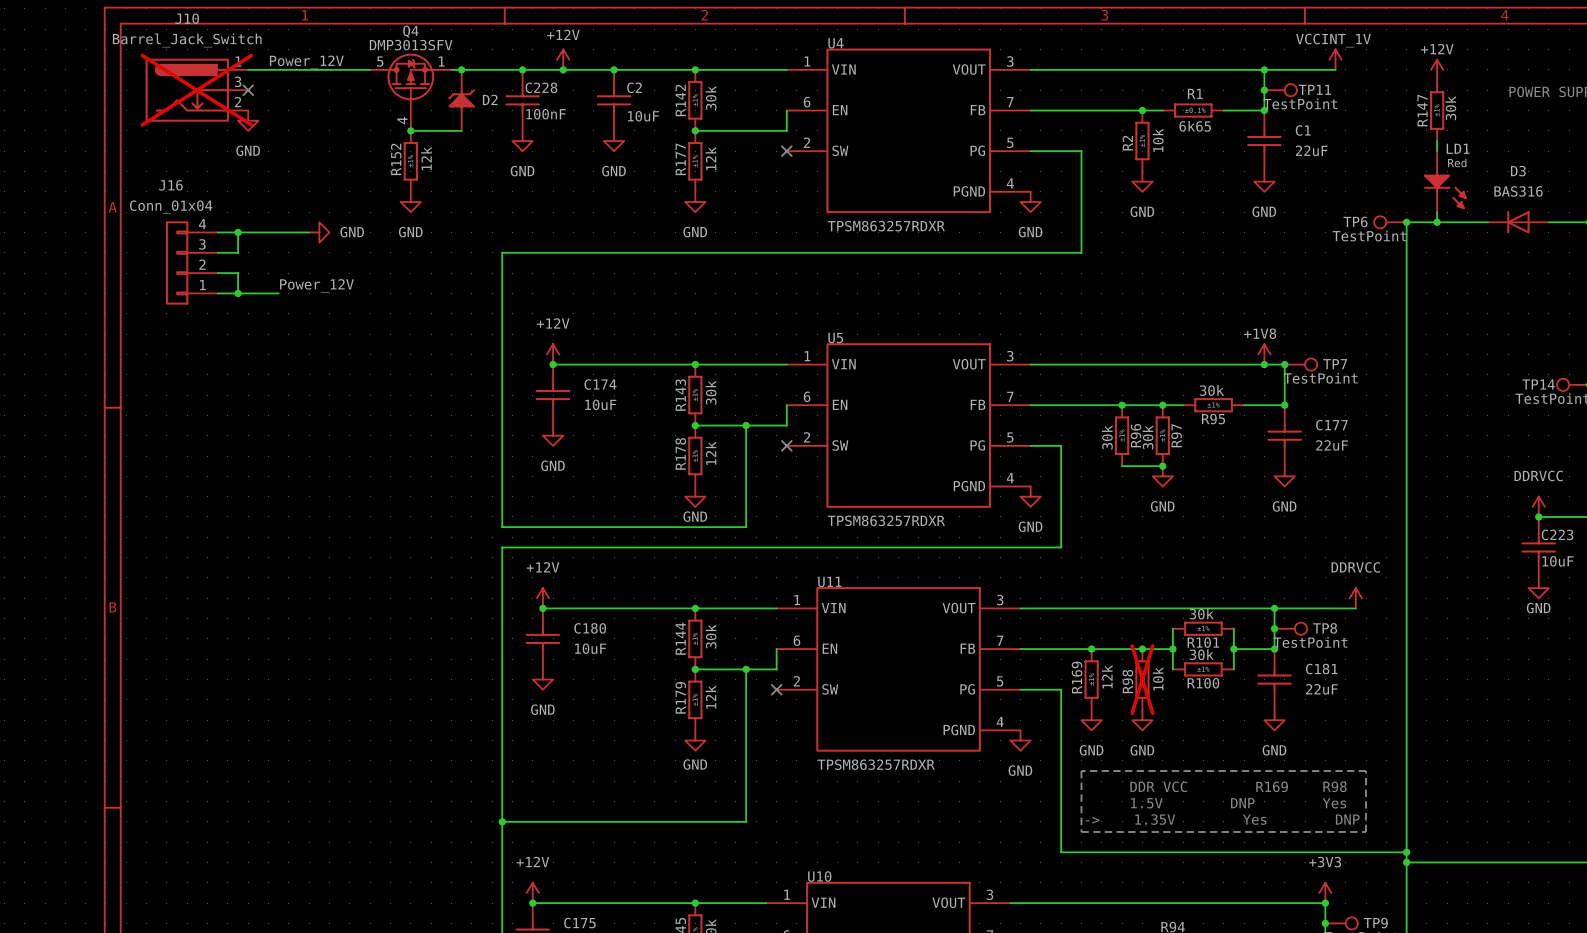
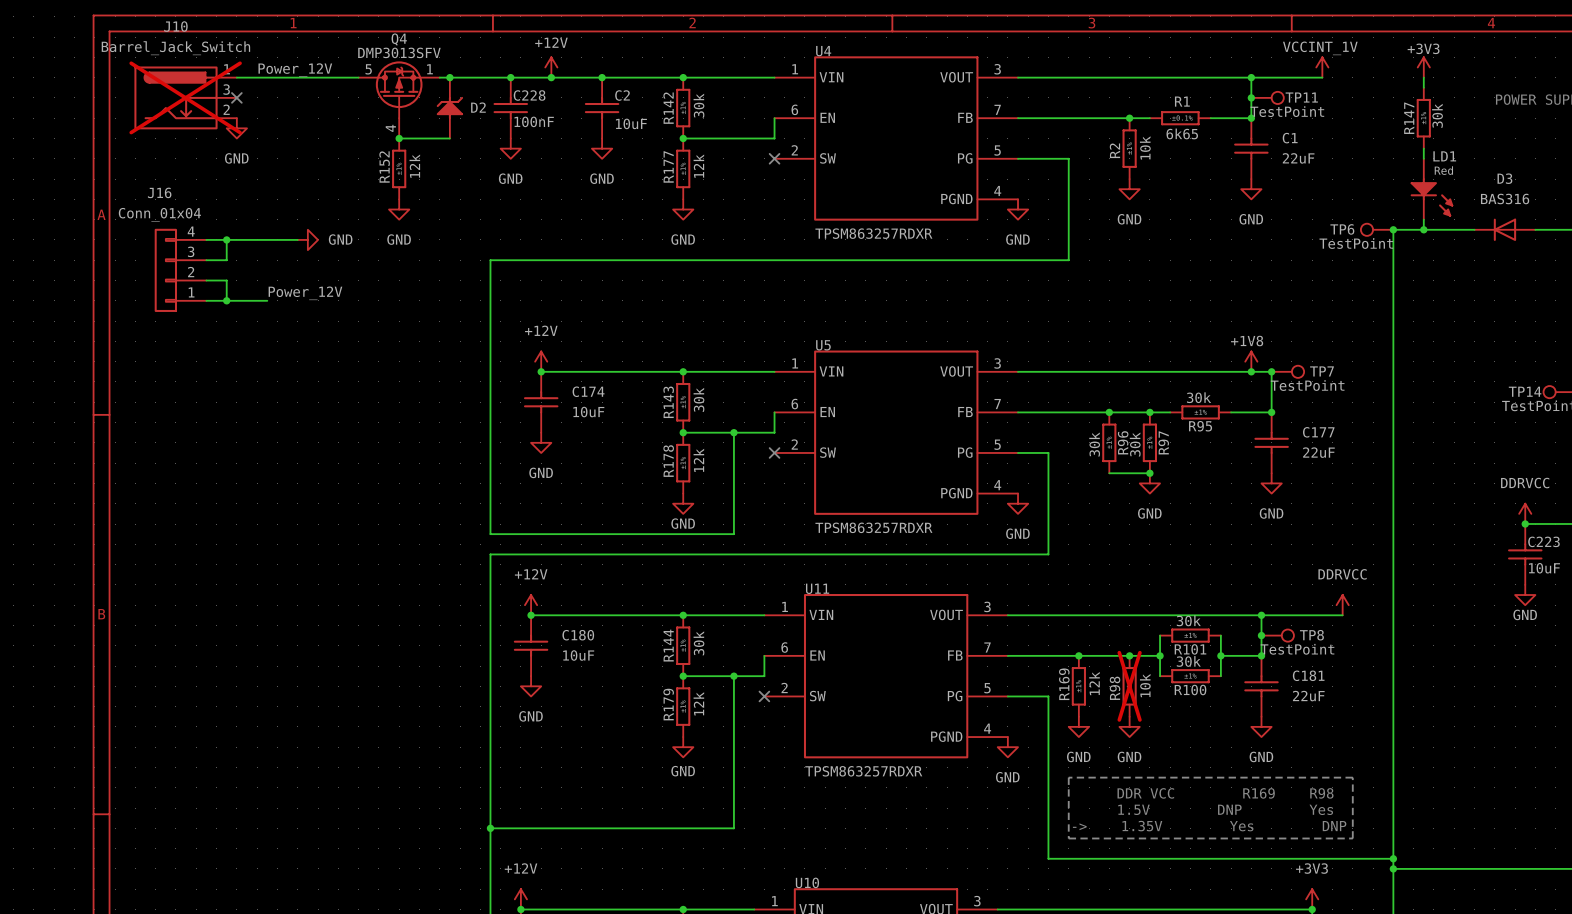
power symbol: none -> +3V3 (1423, 67)
power symbol: +12V (1437, 69) -> none

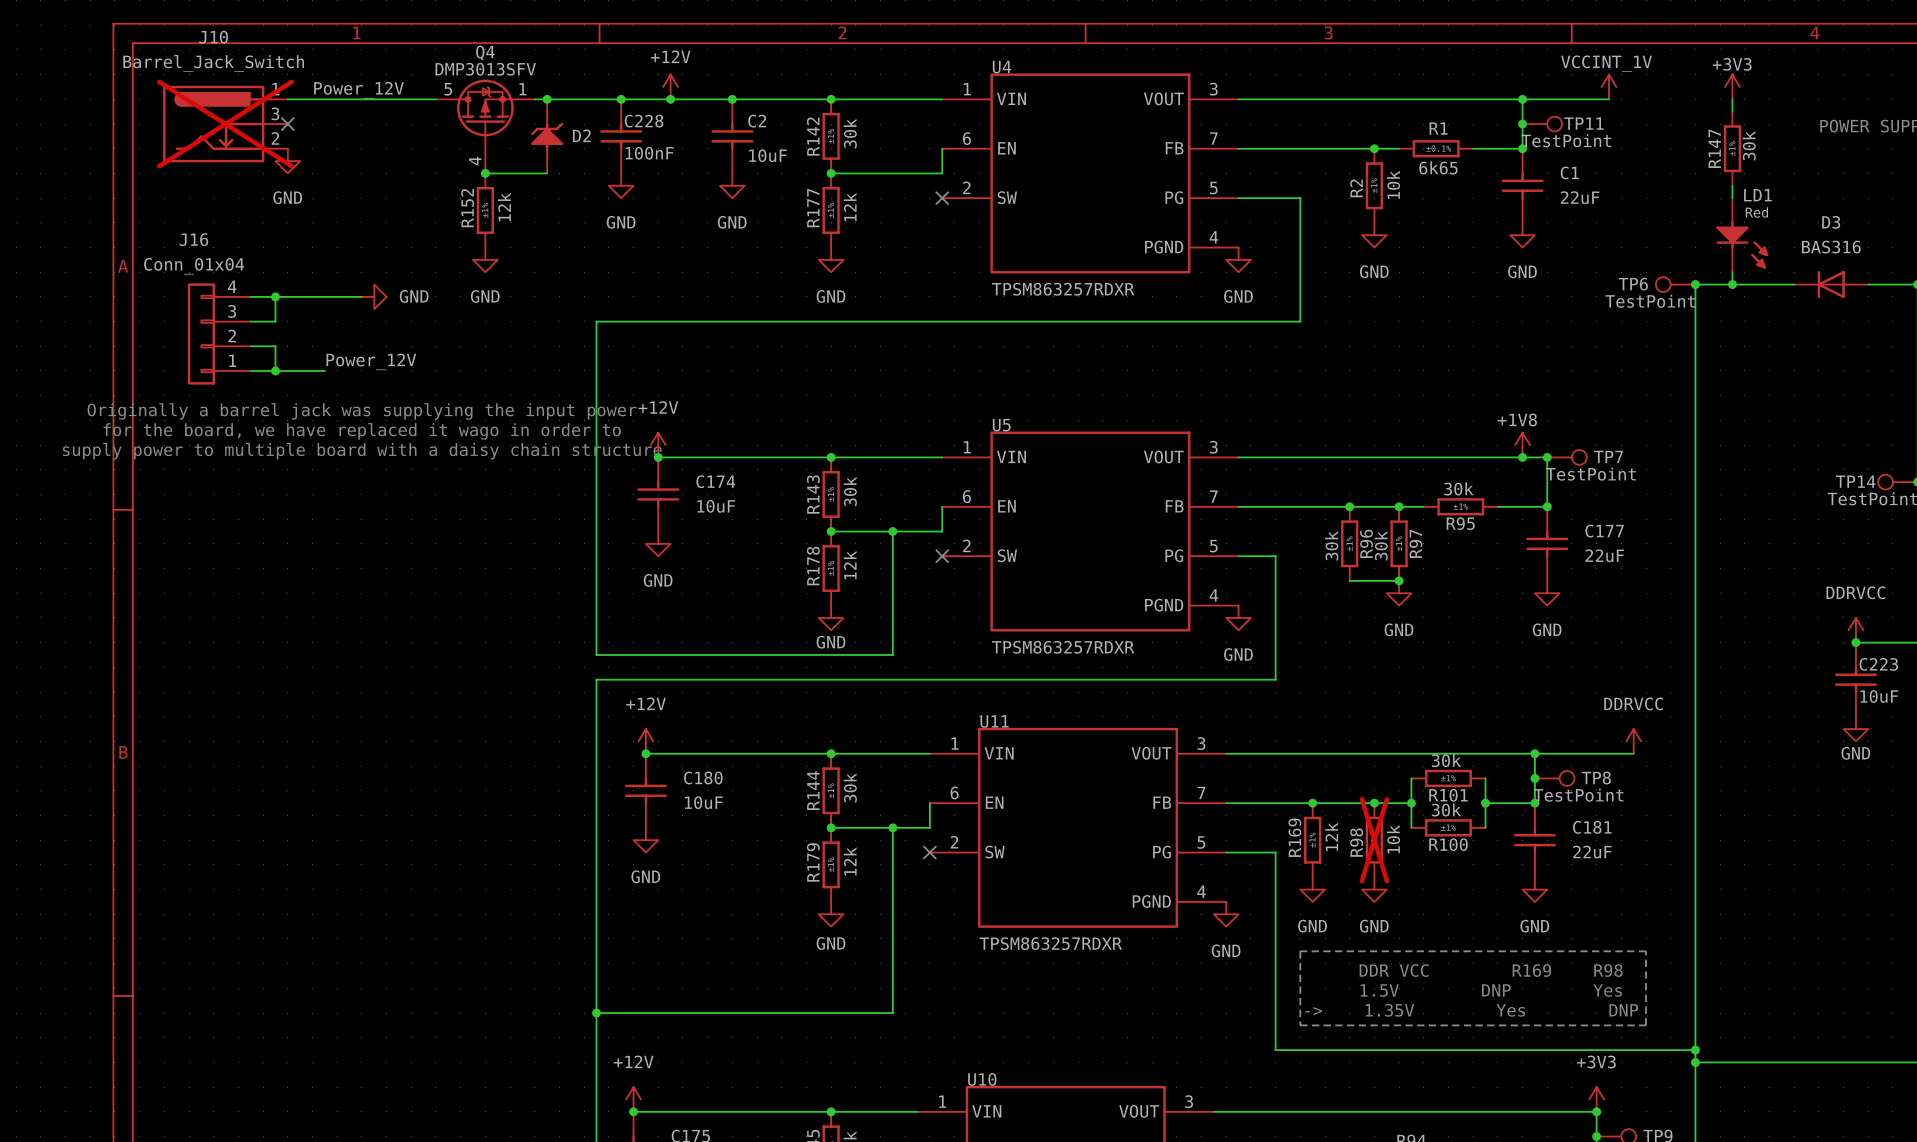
text: none -> Originally a barrel jack was supplying the input power (362, 411)
text: none -> for the board, we have replaced it wago in order to (362, 431)
text: none -> supply power to multiple board with a daisy chain structure (362, 451)

